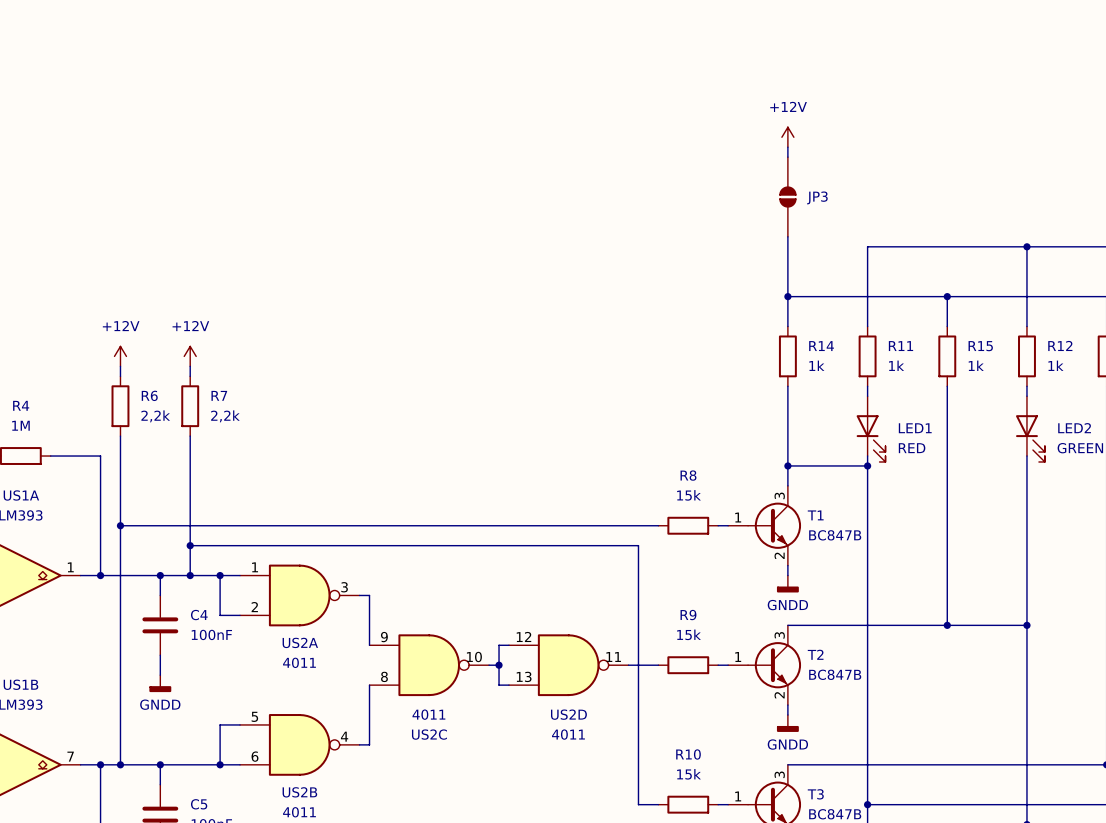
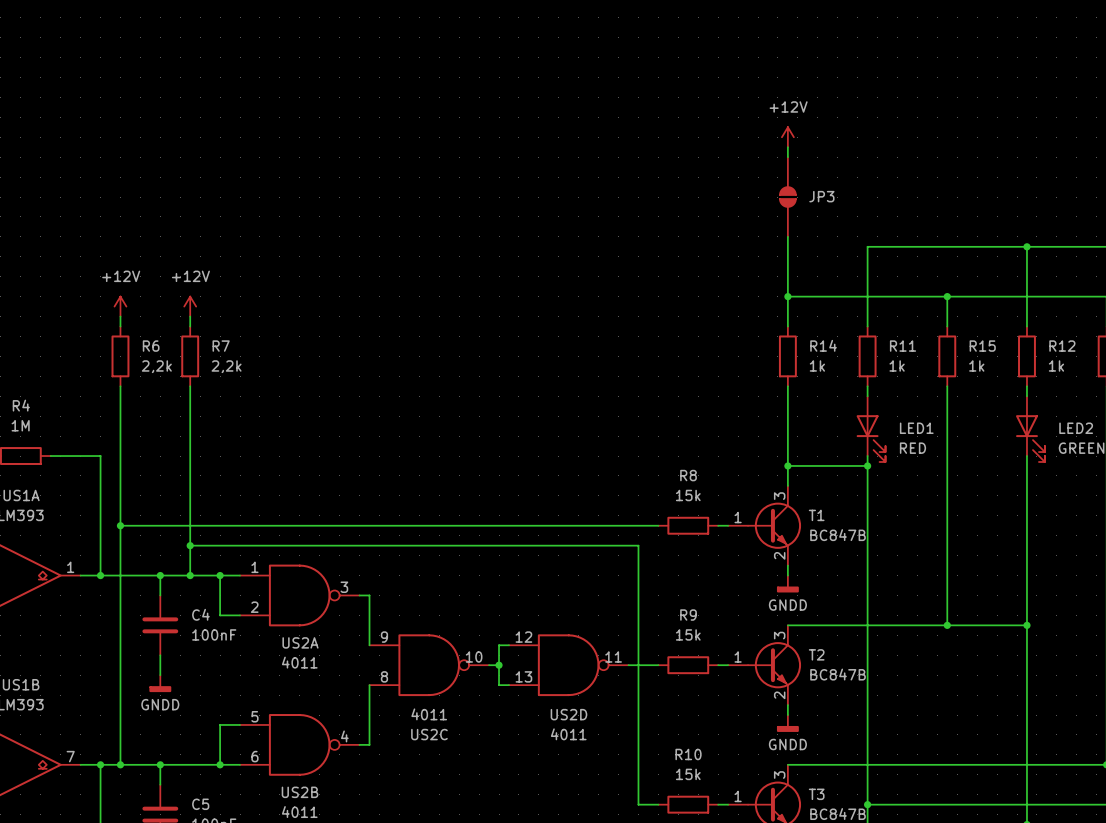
power symbol: none -> +12V (120, 306)
power symbol: none -> +12V (190, 306)
power symbol: +12V (120, 356) -> none
power symbol: +12V (190, 356) -> none
wire: (120, 366) (120, 376) -> (120, 316) (120, 326)
wire: (190, 366) (190, 376) -> (190, 316) (190, 326)
wire: none -> (120, 386) (120, 436)
wire: none -> (190, 386) (190, 436)
R6 position: (120, 406) -> (120, 356)
R7 position: (190, 406) -> (190, 356)

